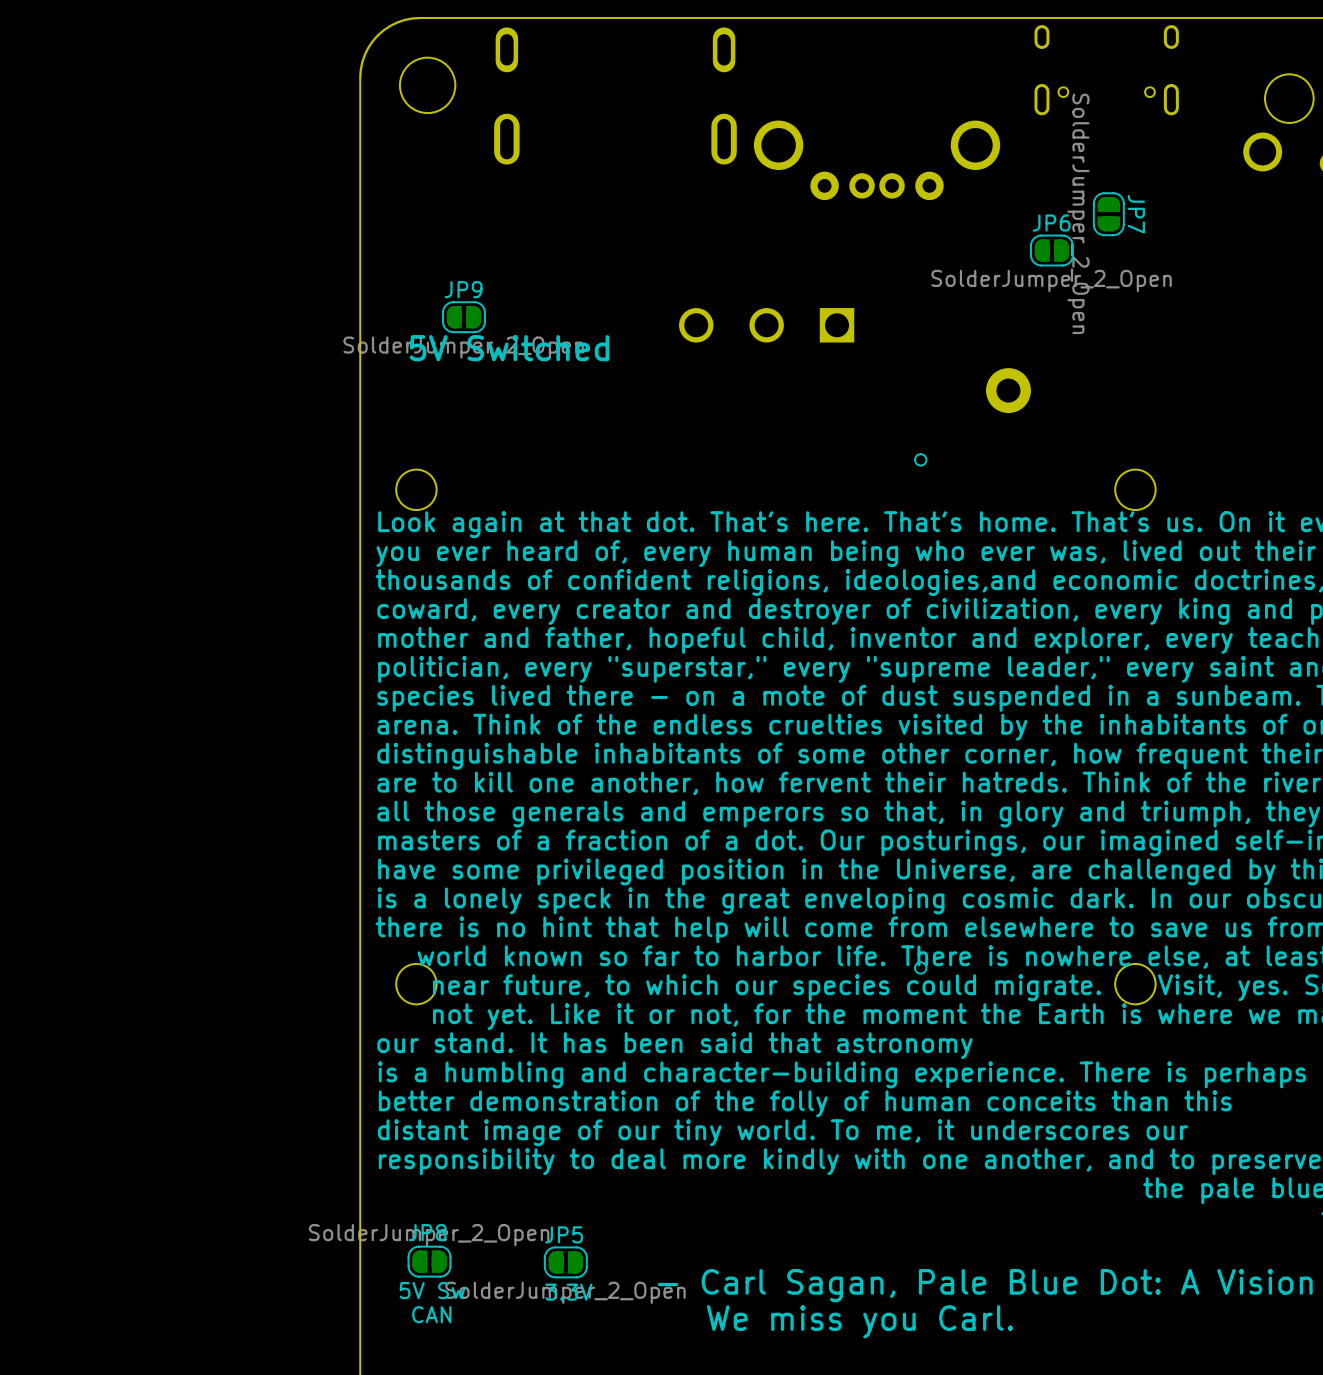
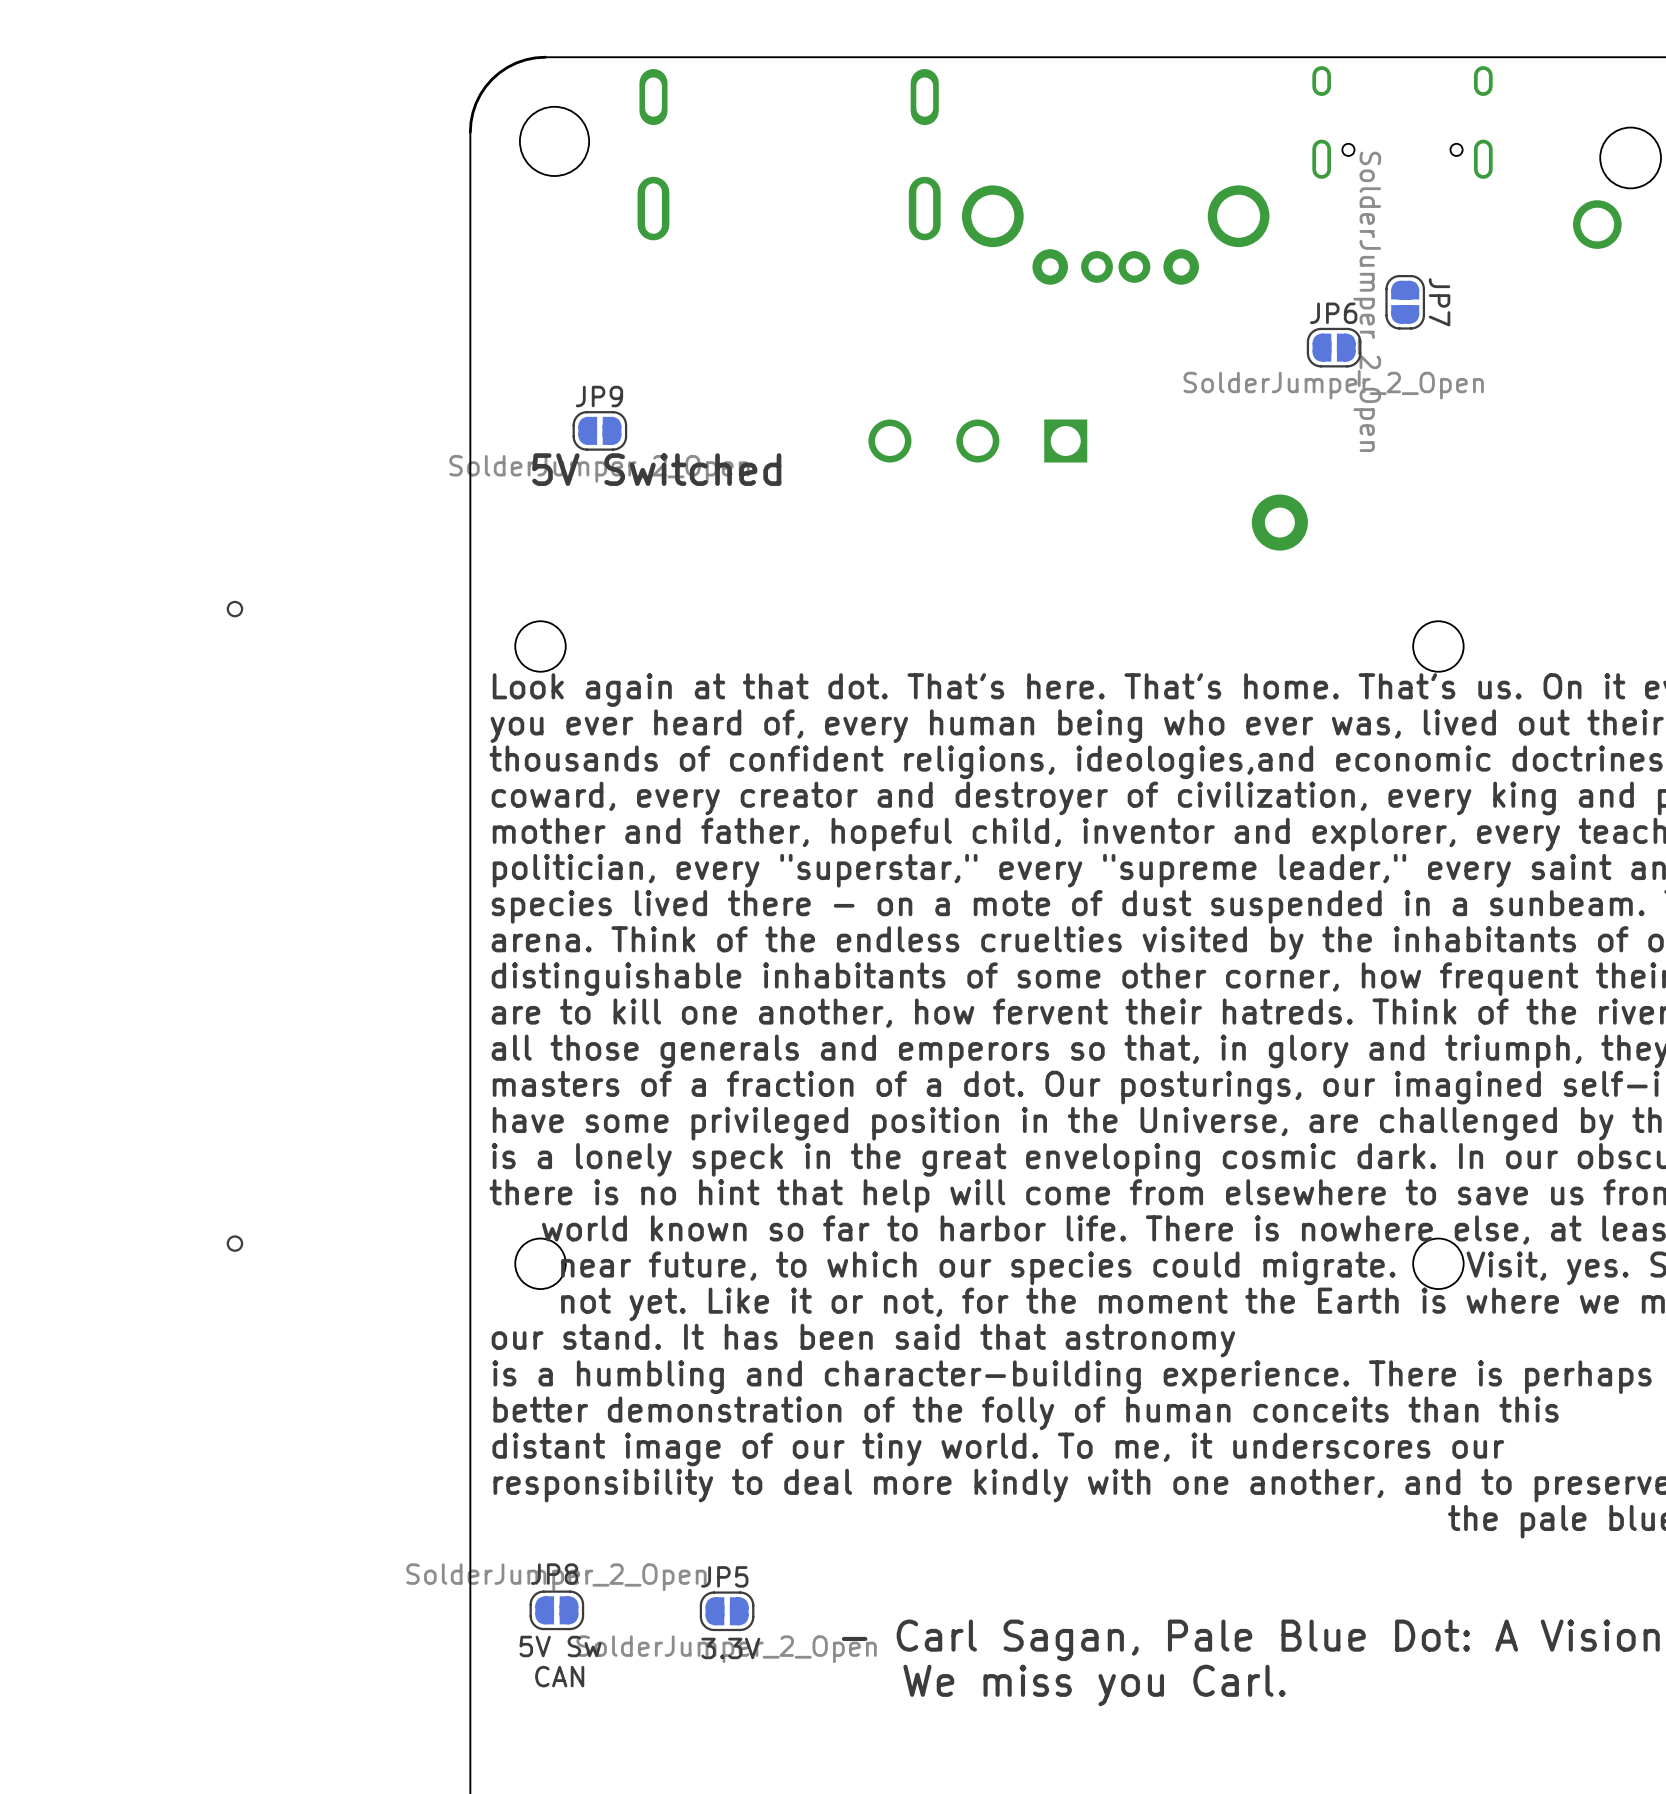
part: none -> (234, 609)
part: (920, 459) -> none
part: none -> (234, 1243)
part: (920, 967) -> none

